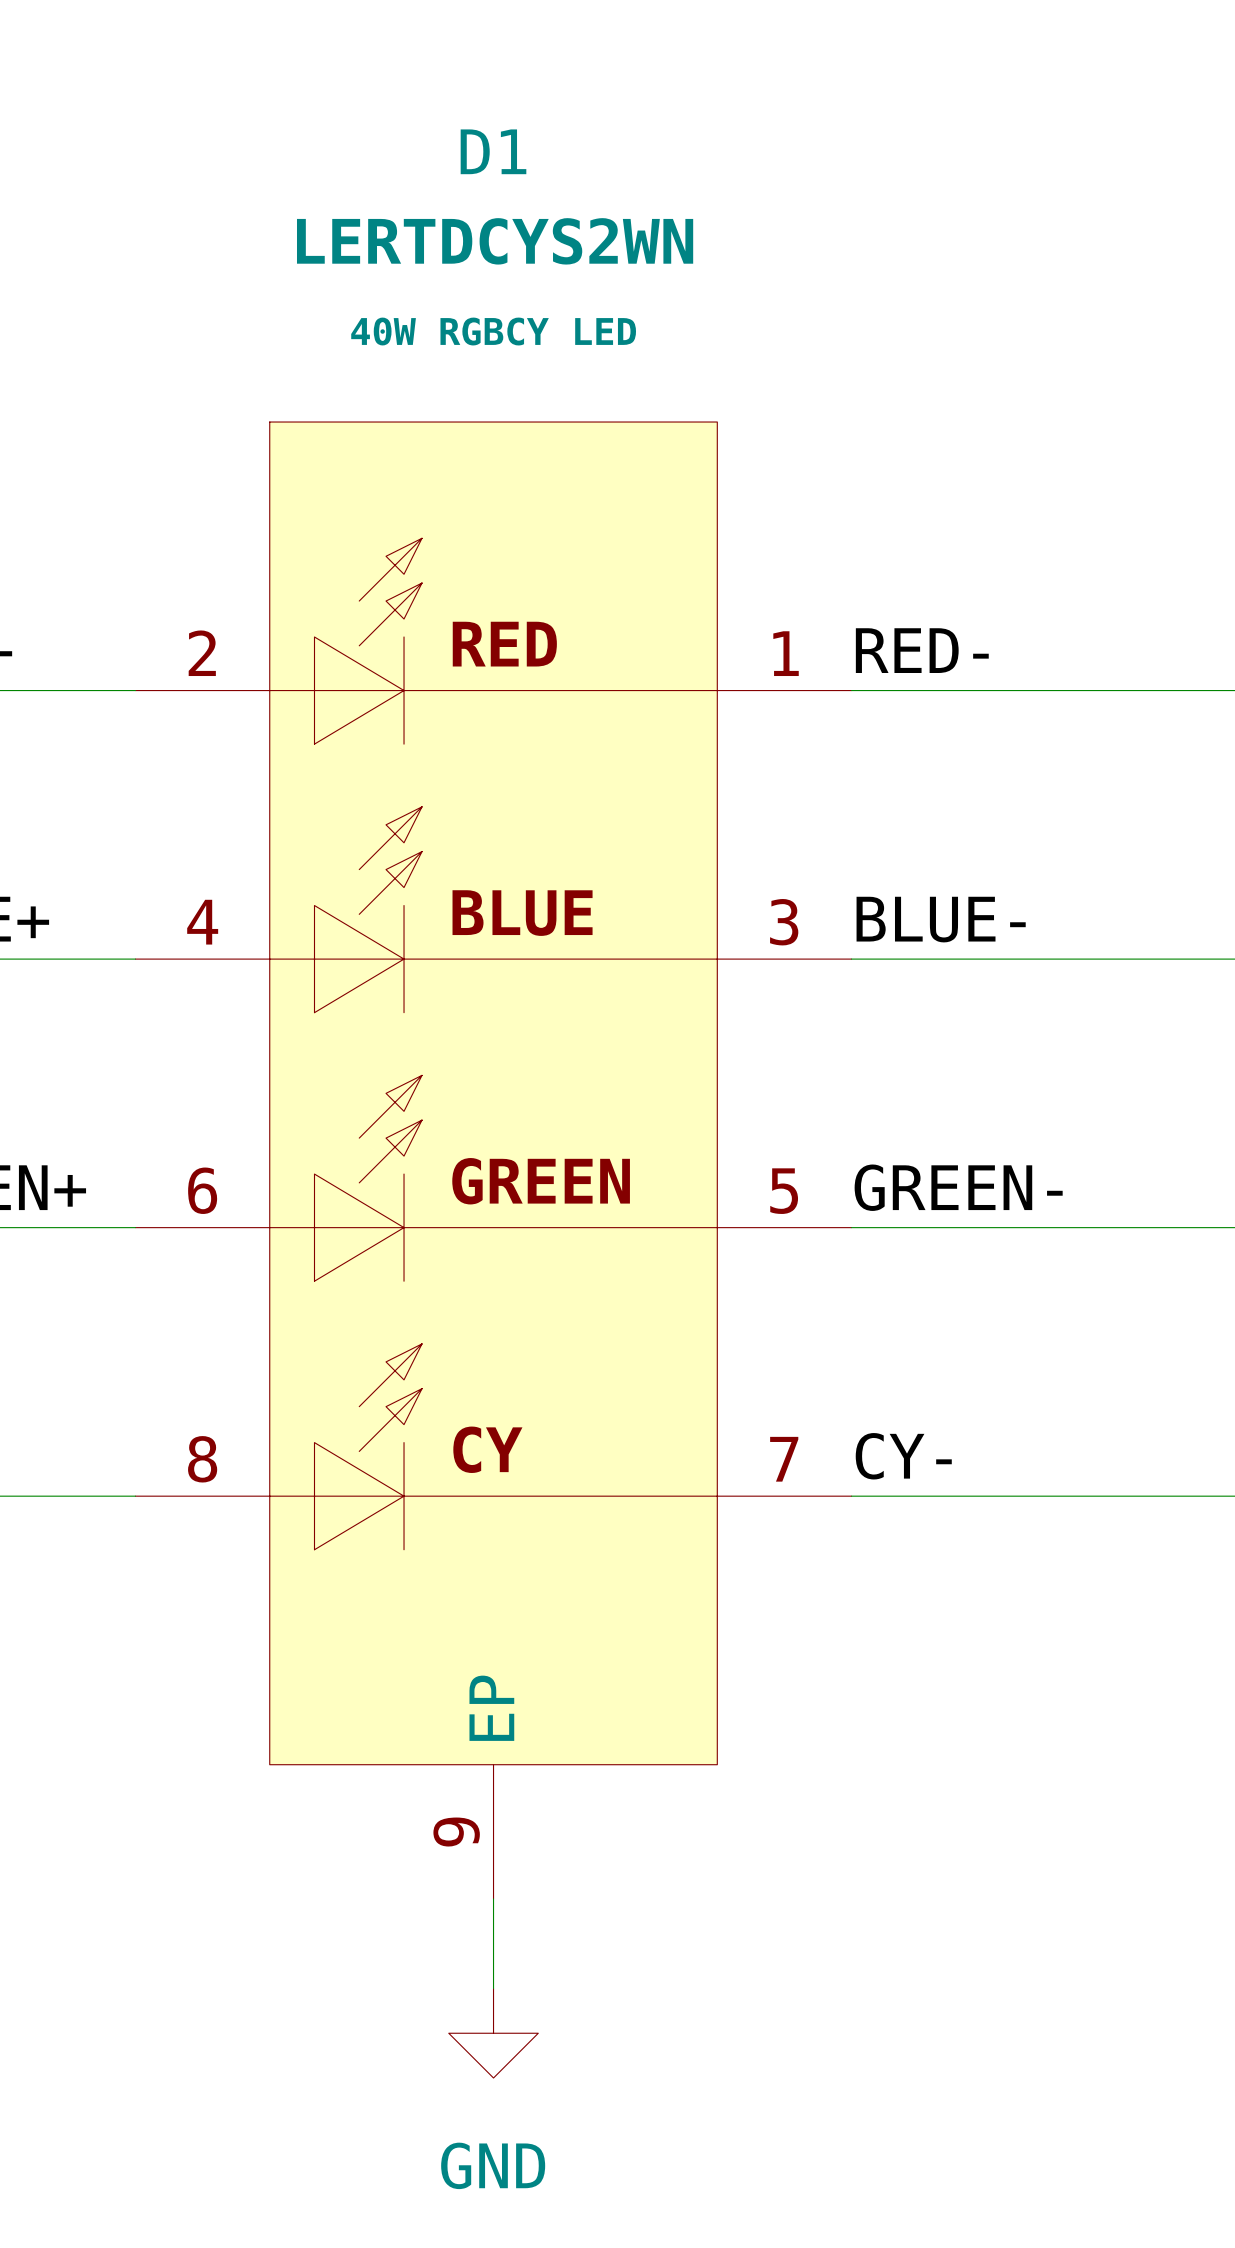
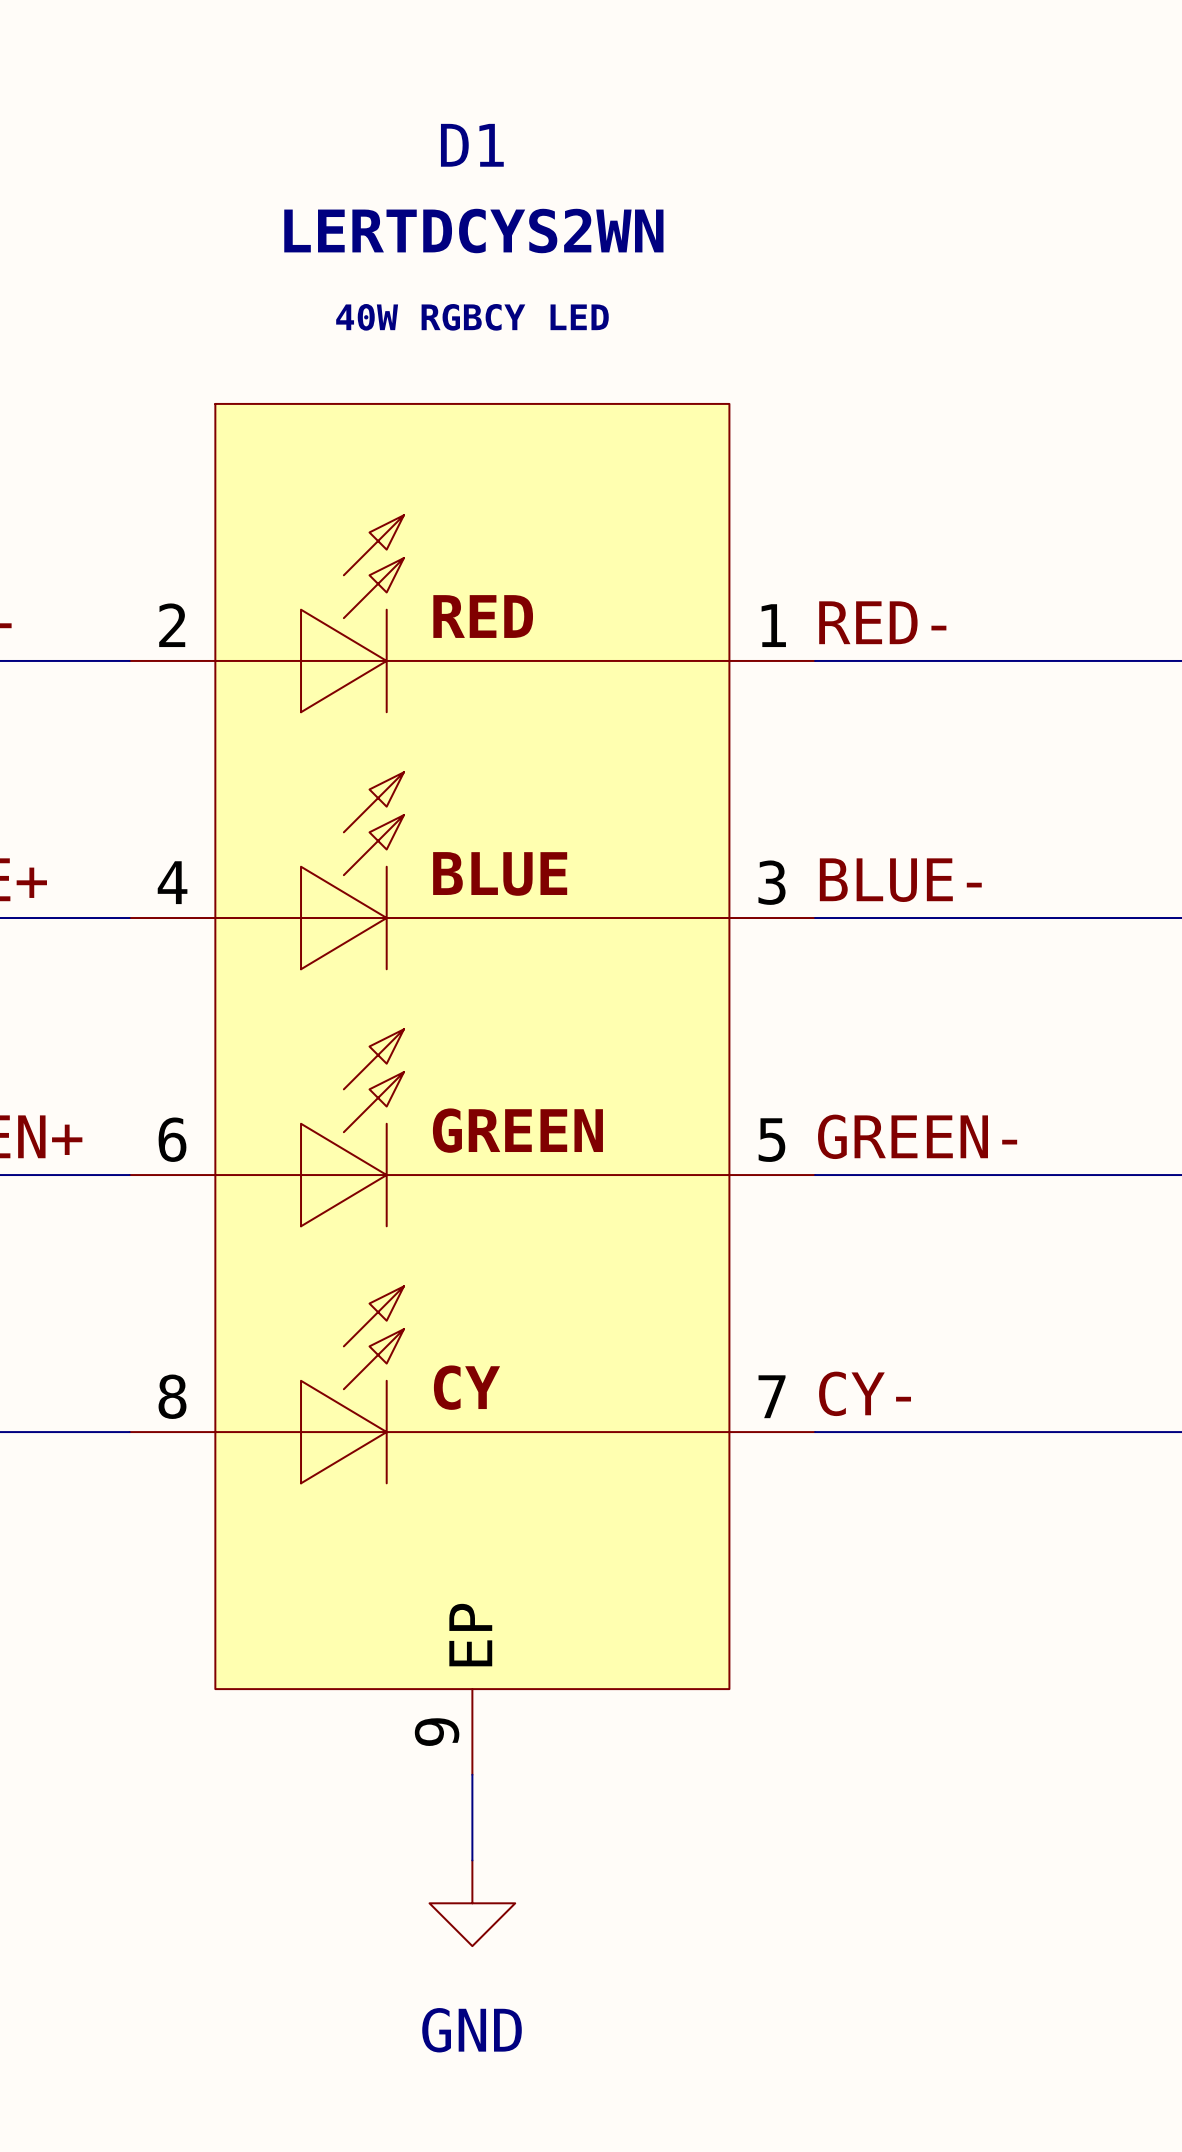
D1 symbol: [135, 422, 852, 1899] -> [129, 403, 816, 1775]
power symbol position: GND (493, 2033) -> GND (472, 1903)

